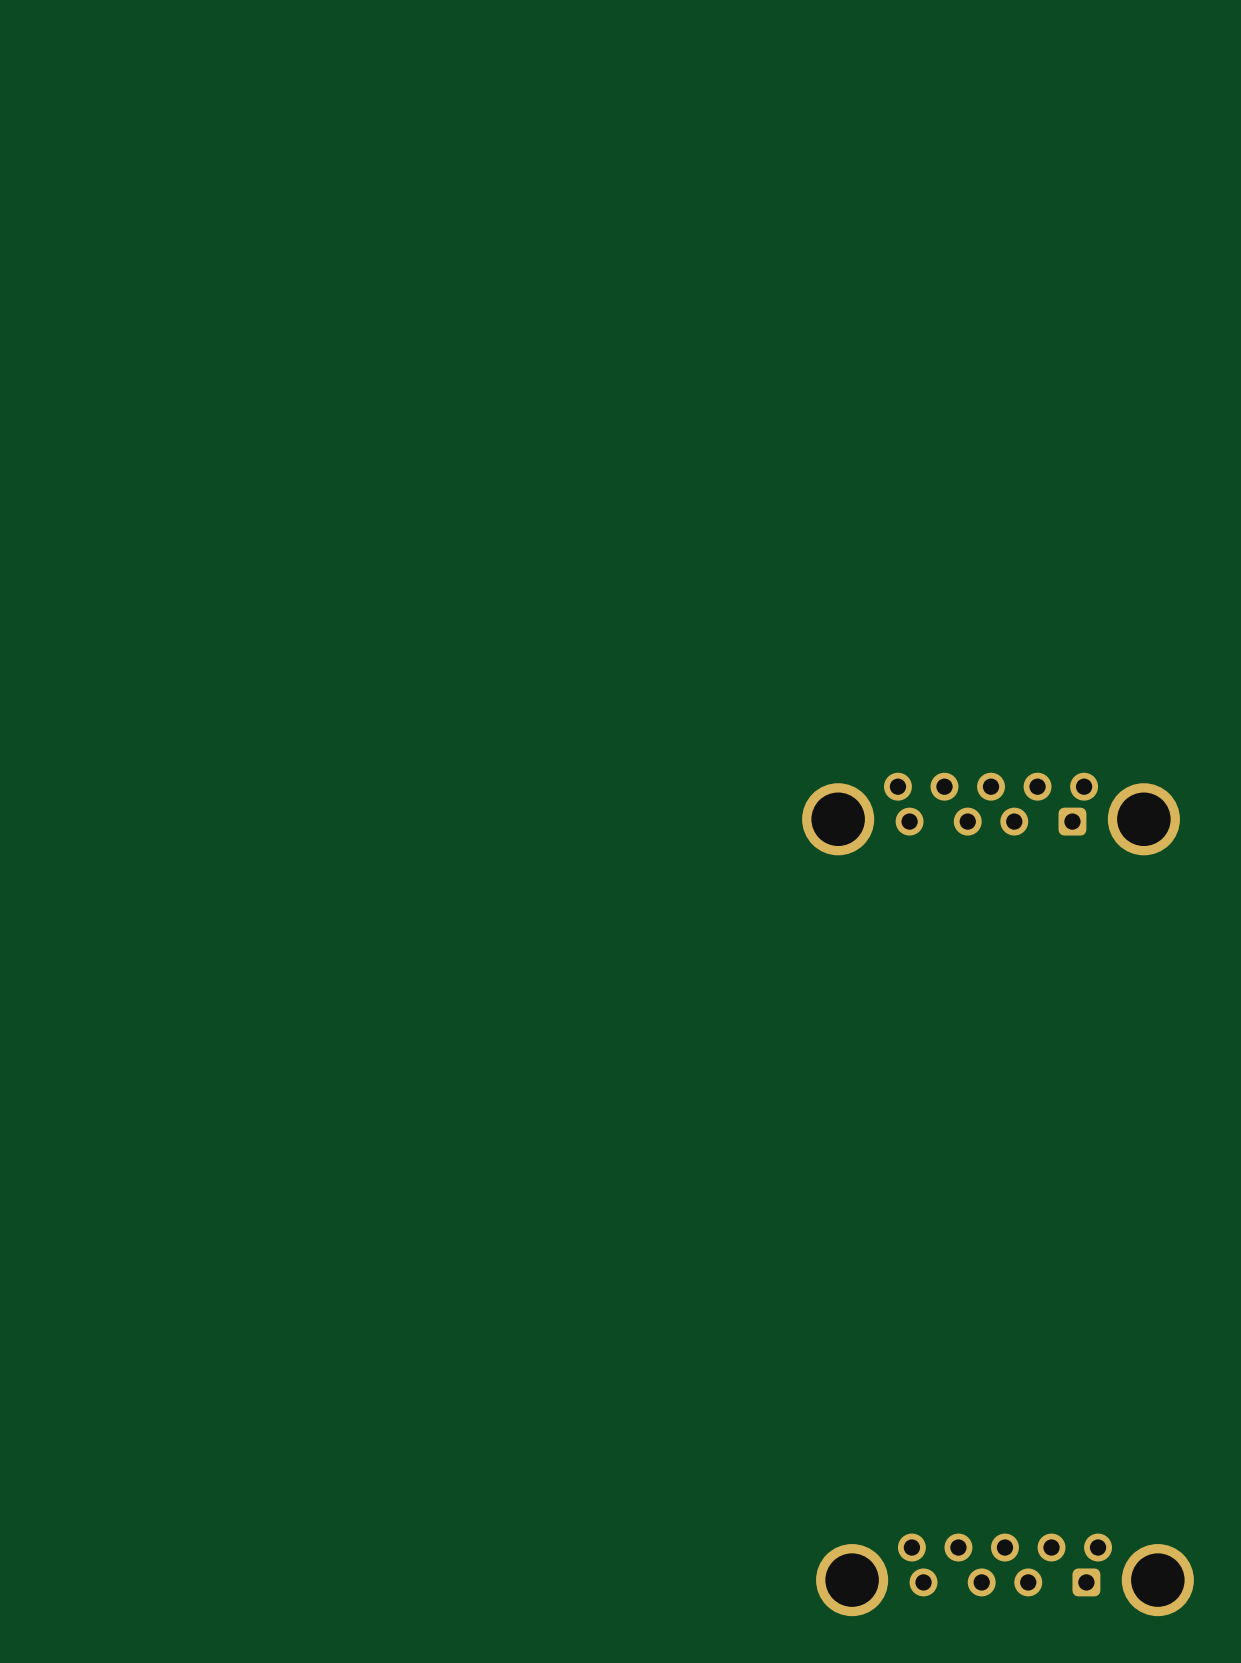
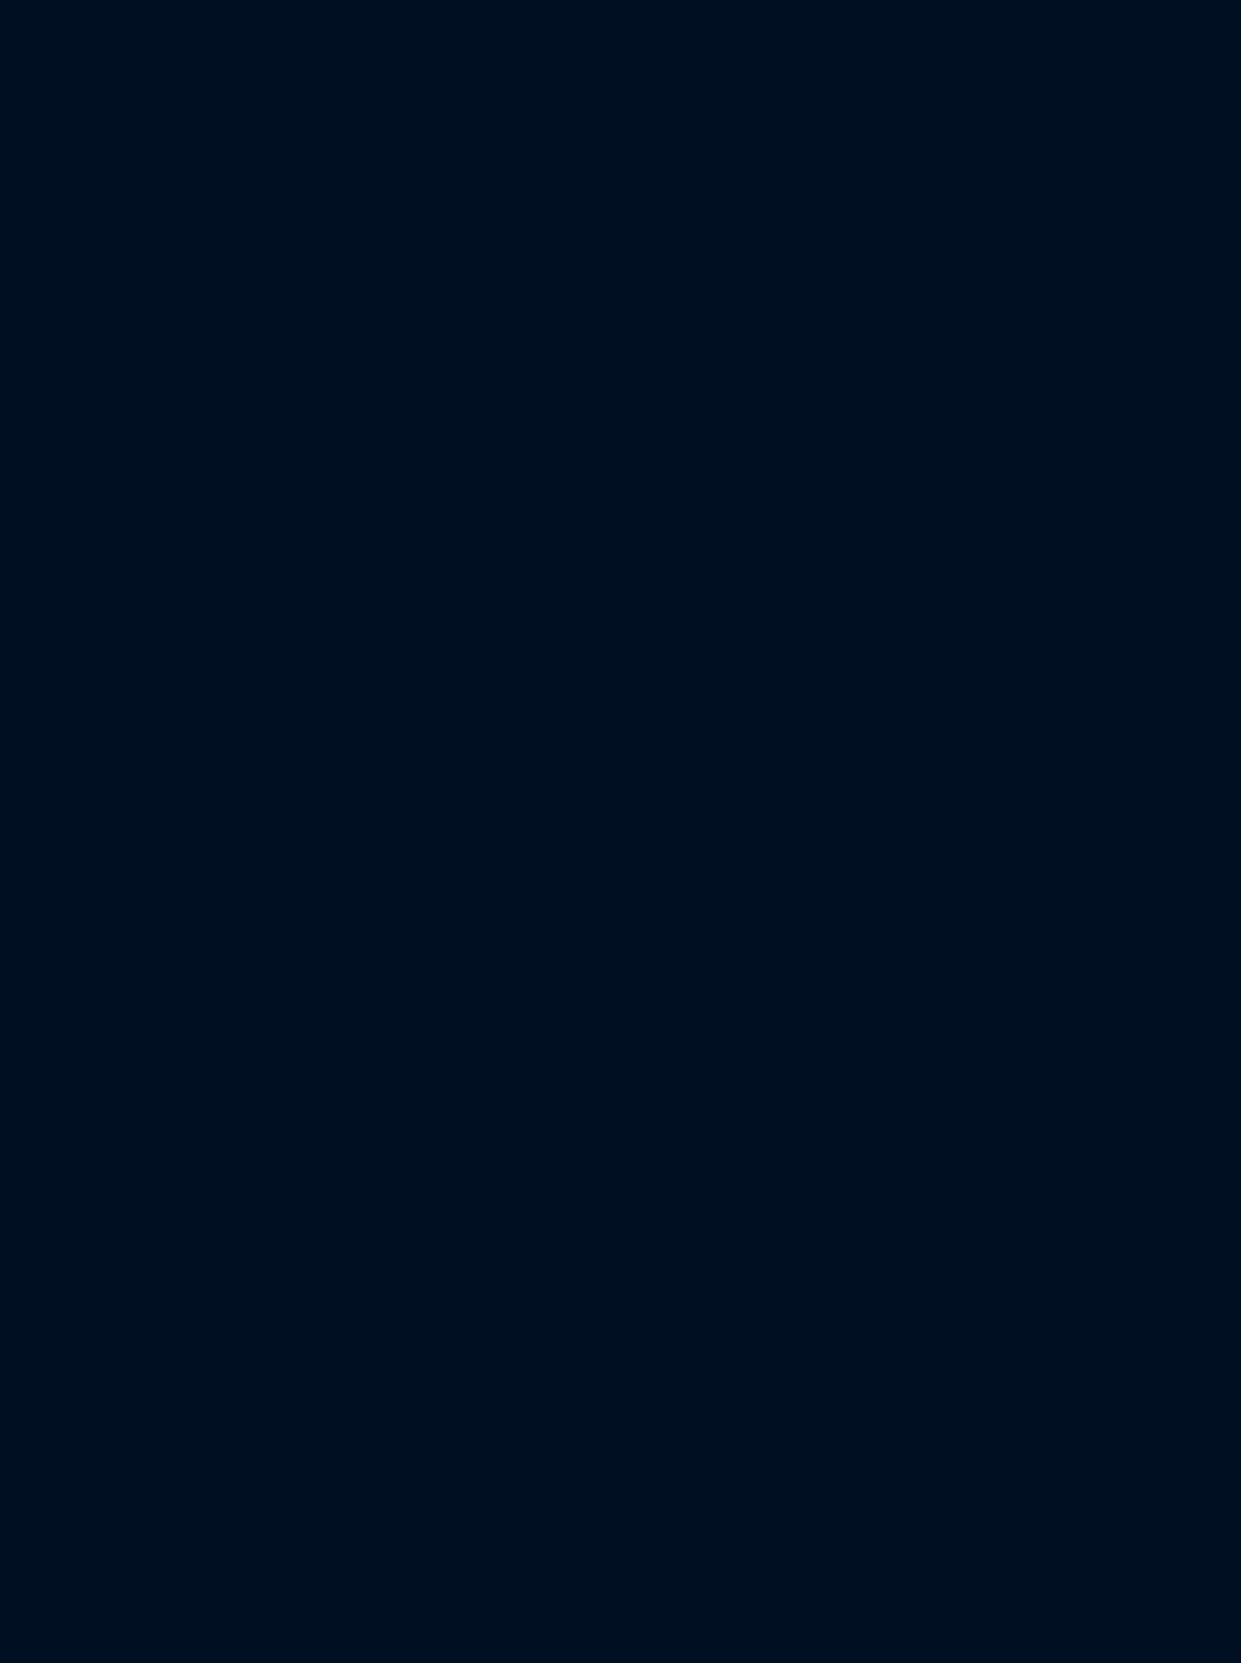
part: (991, 814) -> none
part: (1004, 1574) -> none

